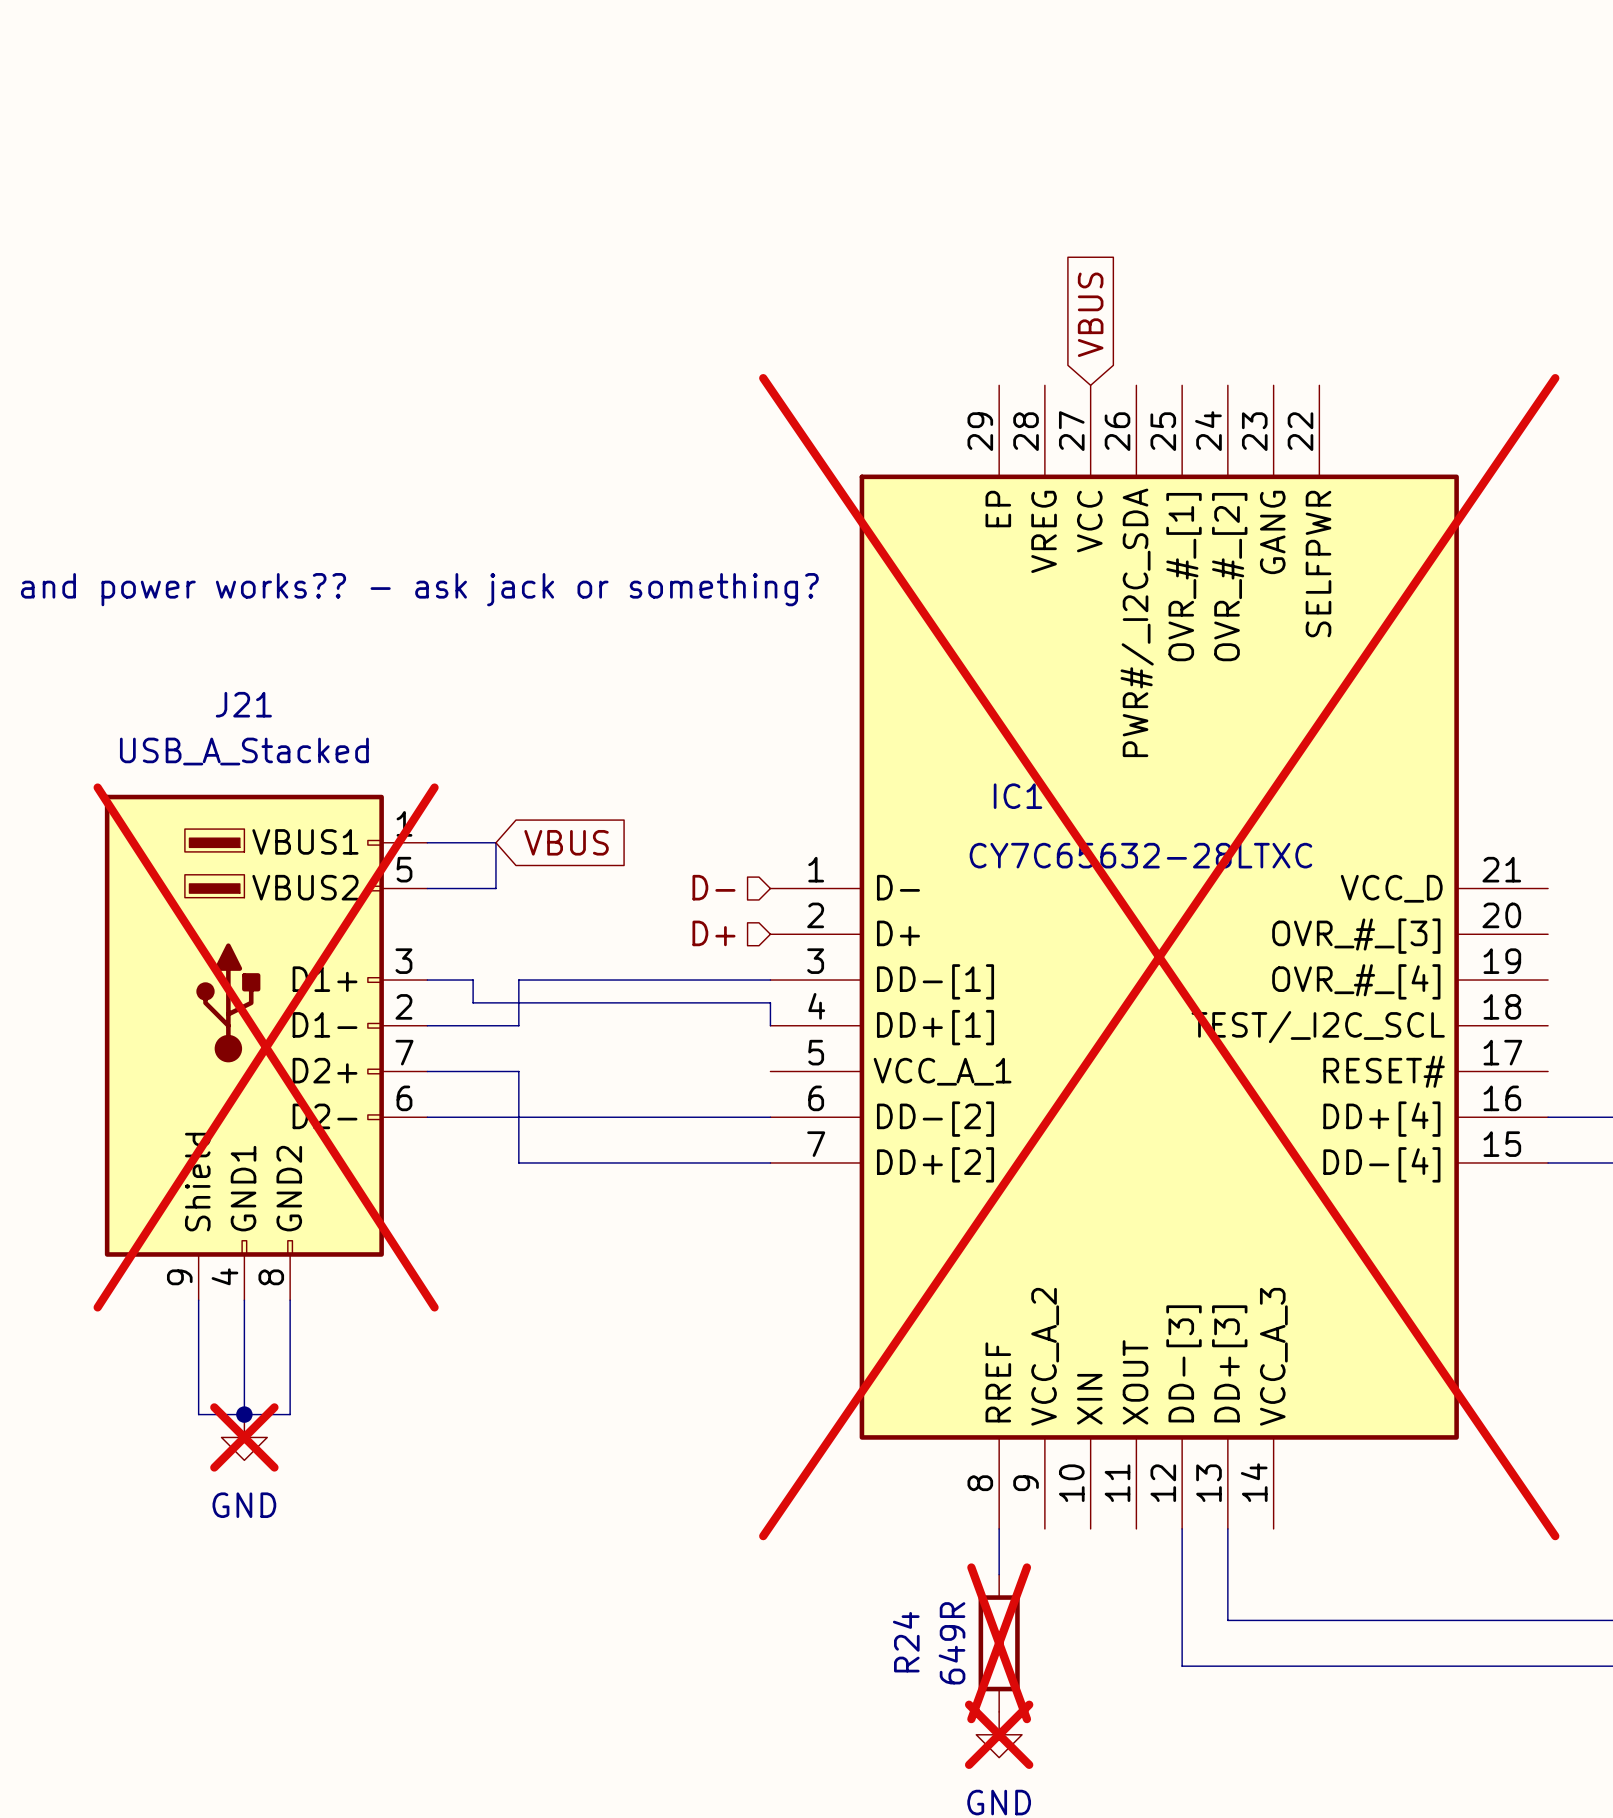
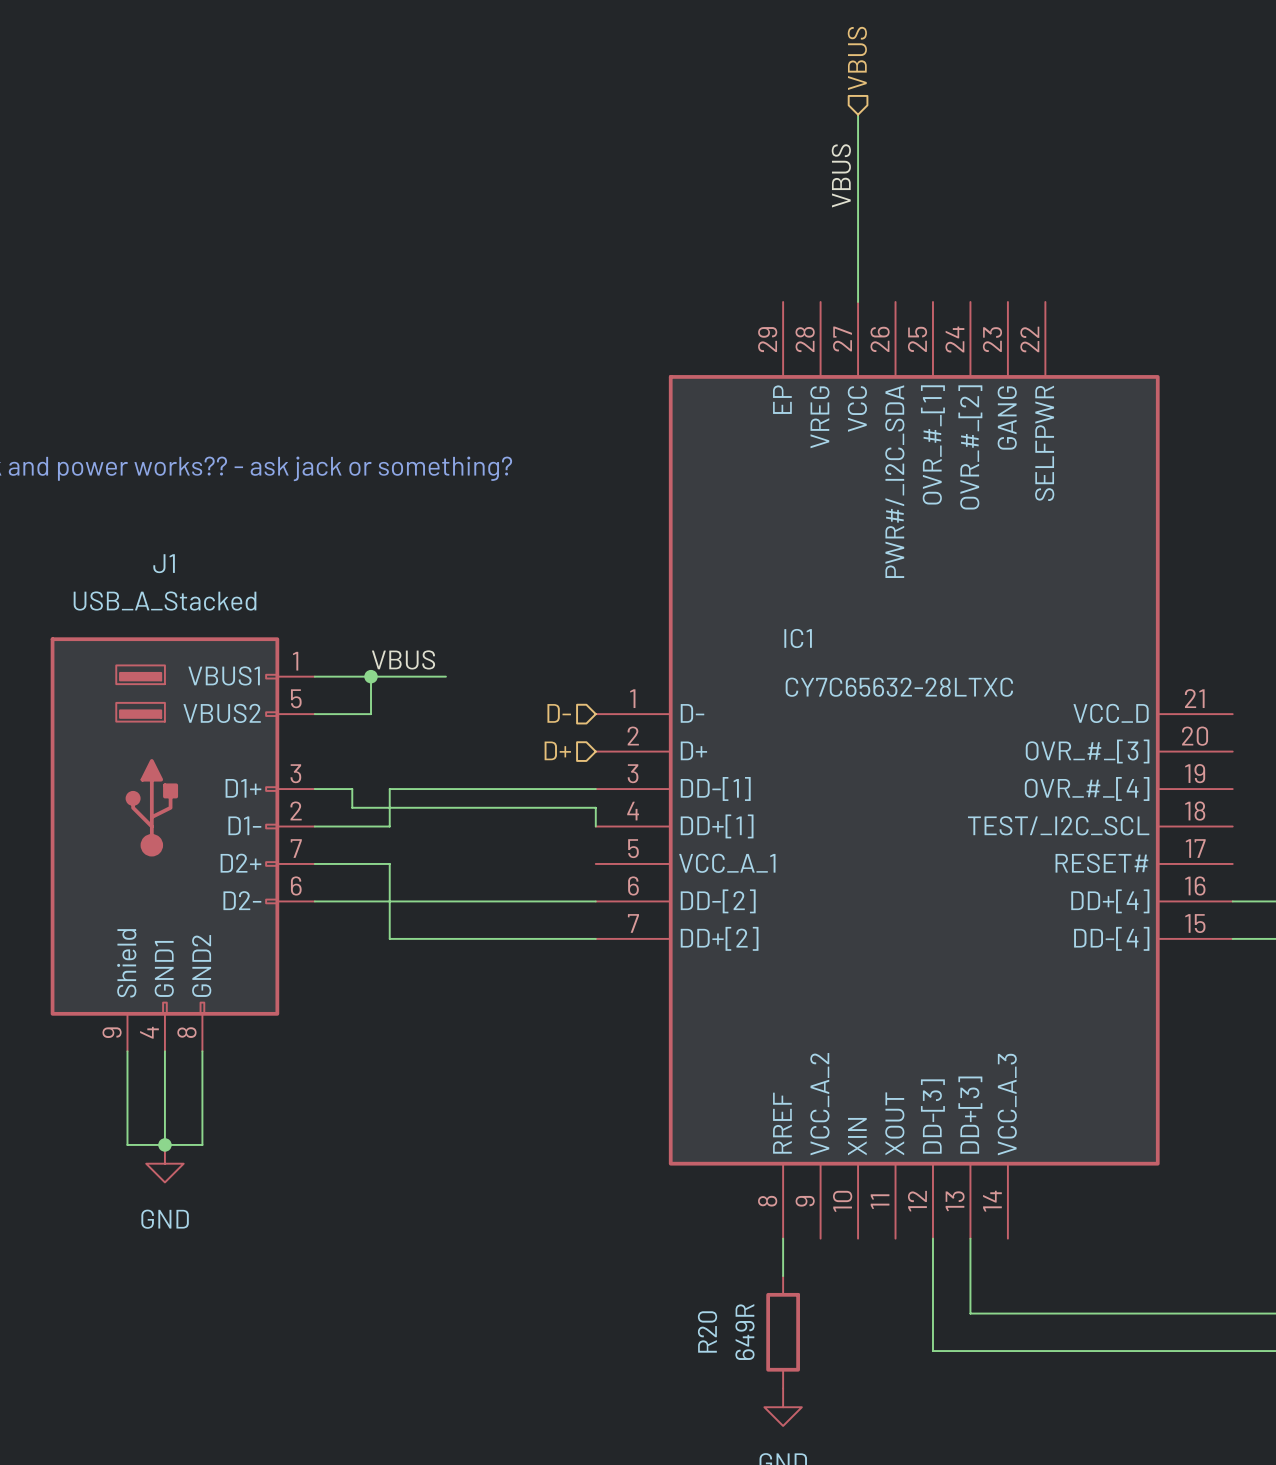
hierarchical label: none -> VBUS (857, 58)
wire: none -> (858, 114) (858, 302)
label: none -> VBUS (841, 175)
global label: VBUS (1090, 314) -> none
J21 name: J21 (243, 704) -> J1 (164, 563)
label: none -> VBUS (403, 659)
wire: none -> (371, 676) (445, 676)
junction: none -> (371, 676)
global label: VBUS (566, 842) -> none
IC1 do-not-place cross: (1159, 957) -> none
J21 do-not-place cross: (266, 1047) -> none
power symbol do-not-place cross: (244, 1437) -> none
R24 name: R24 (906, 1642) -> R20 (707, 1331)
R24 do-not-place cross: (999, 1643) -> none
power symbol do-not-place cross: (999, 1734) -> none

